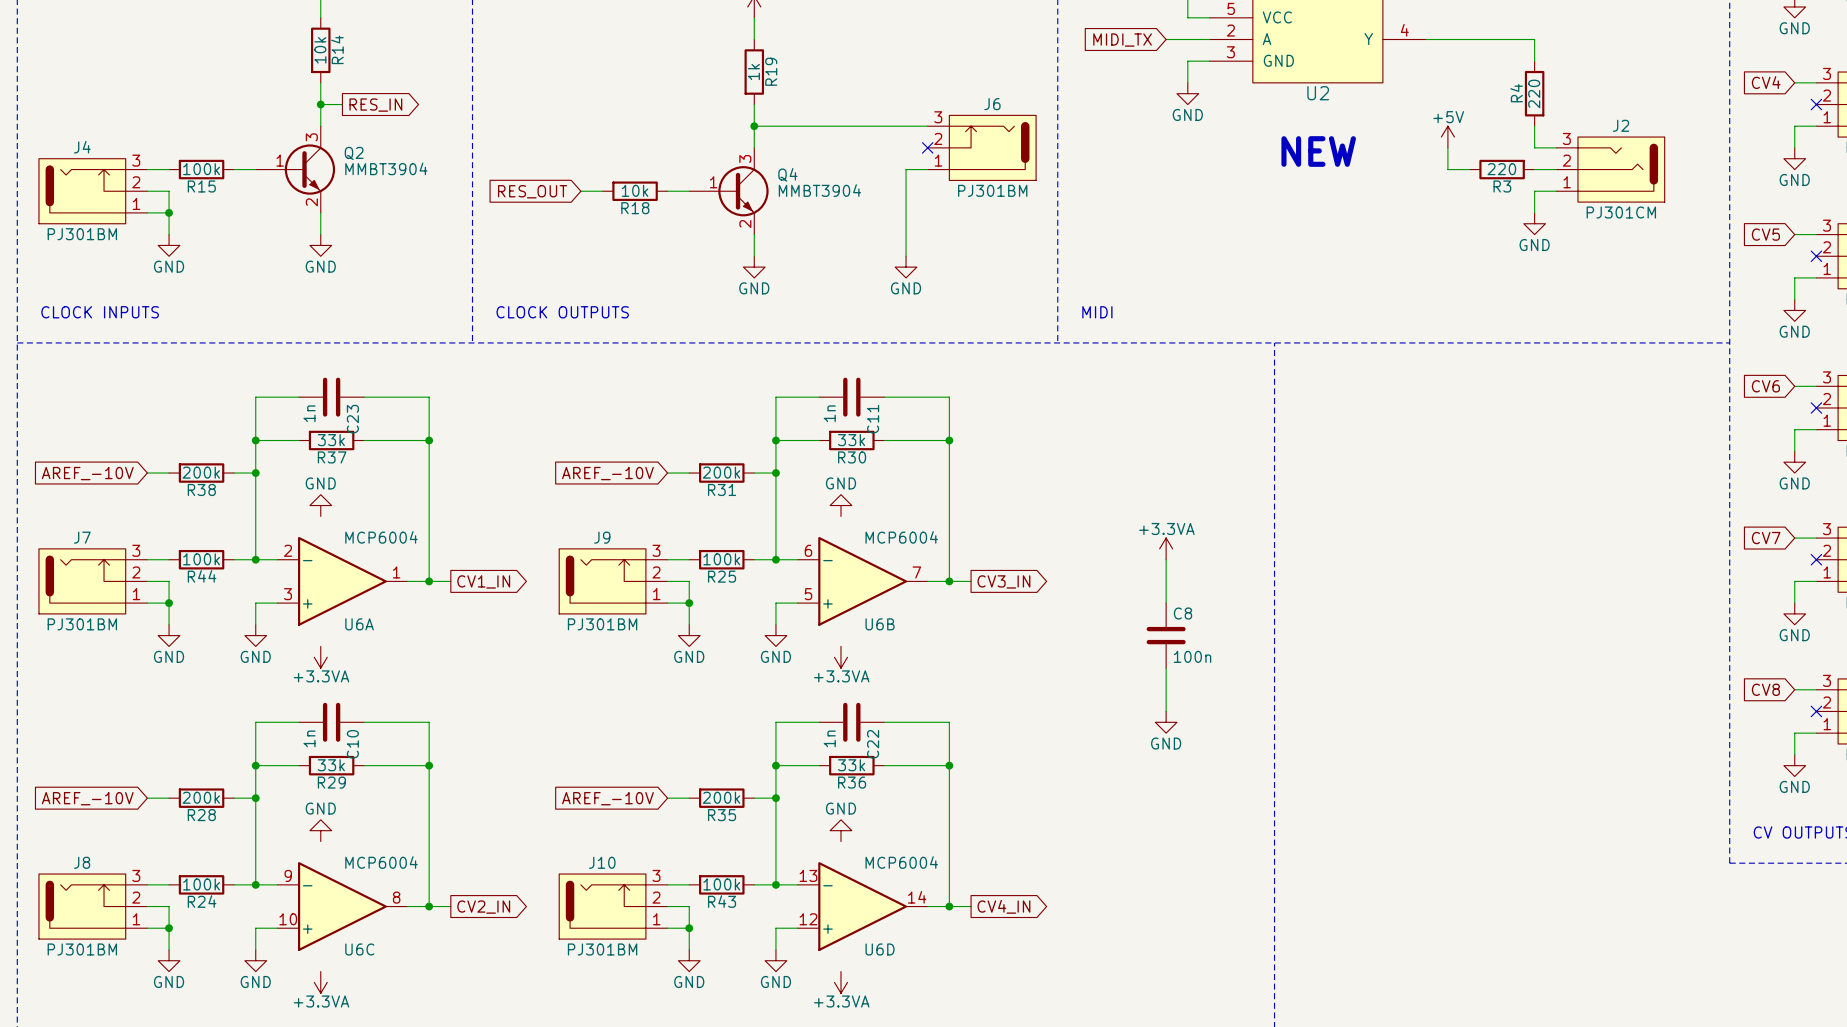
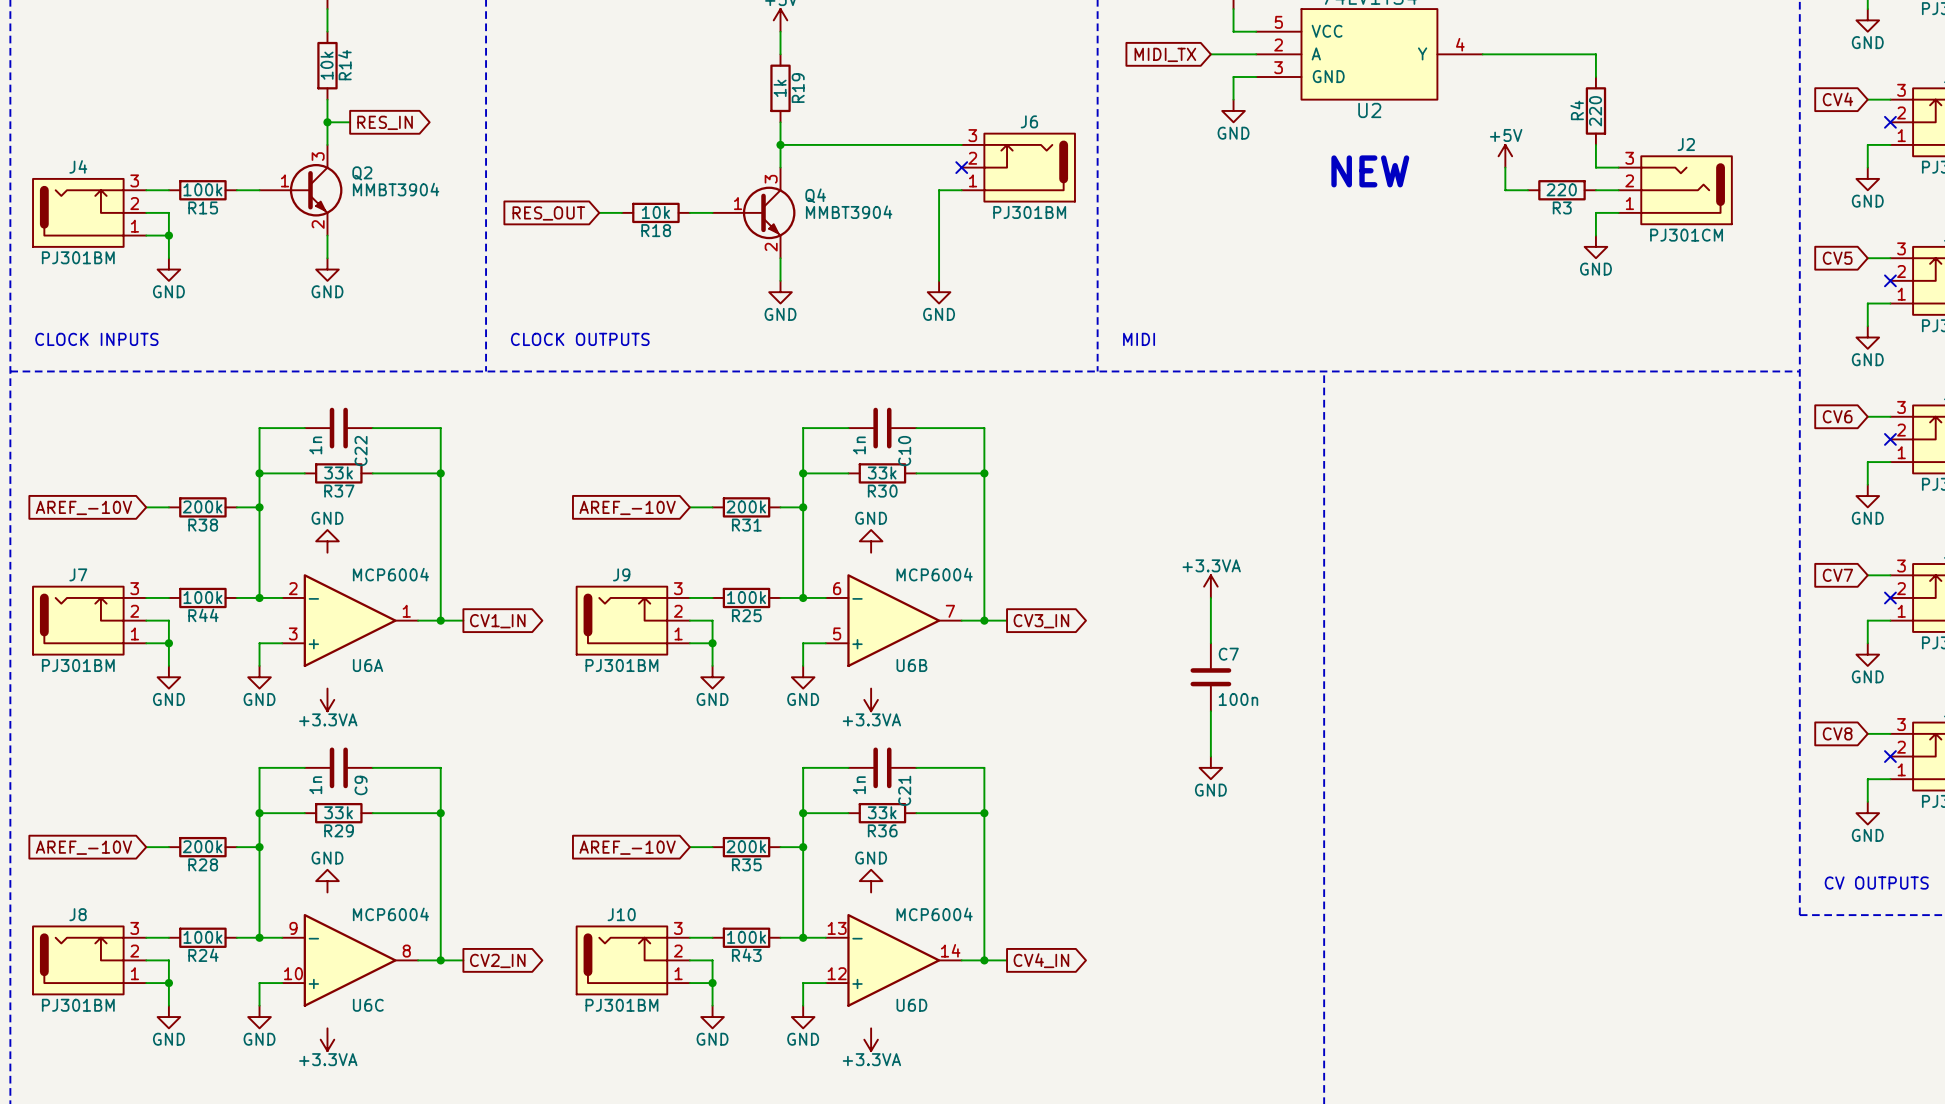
C23 name: C23 (352, 419) -> C22 (361, 451)
C11 name: C11 (873, 419) -> C10 (904, 451)
C8 name: C8 (1182, 613) -> C7 (1228, 654)
C10 name: C10 (352, 744) -> C9 (361, 785)
C22 name: C22 (873, 744) -> C21 (904, 790)

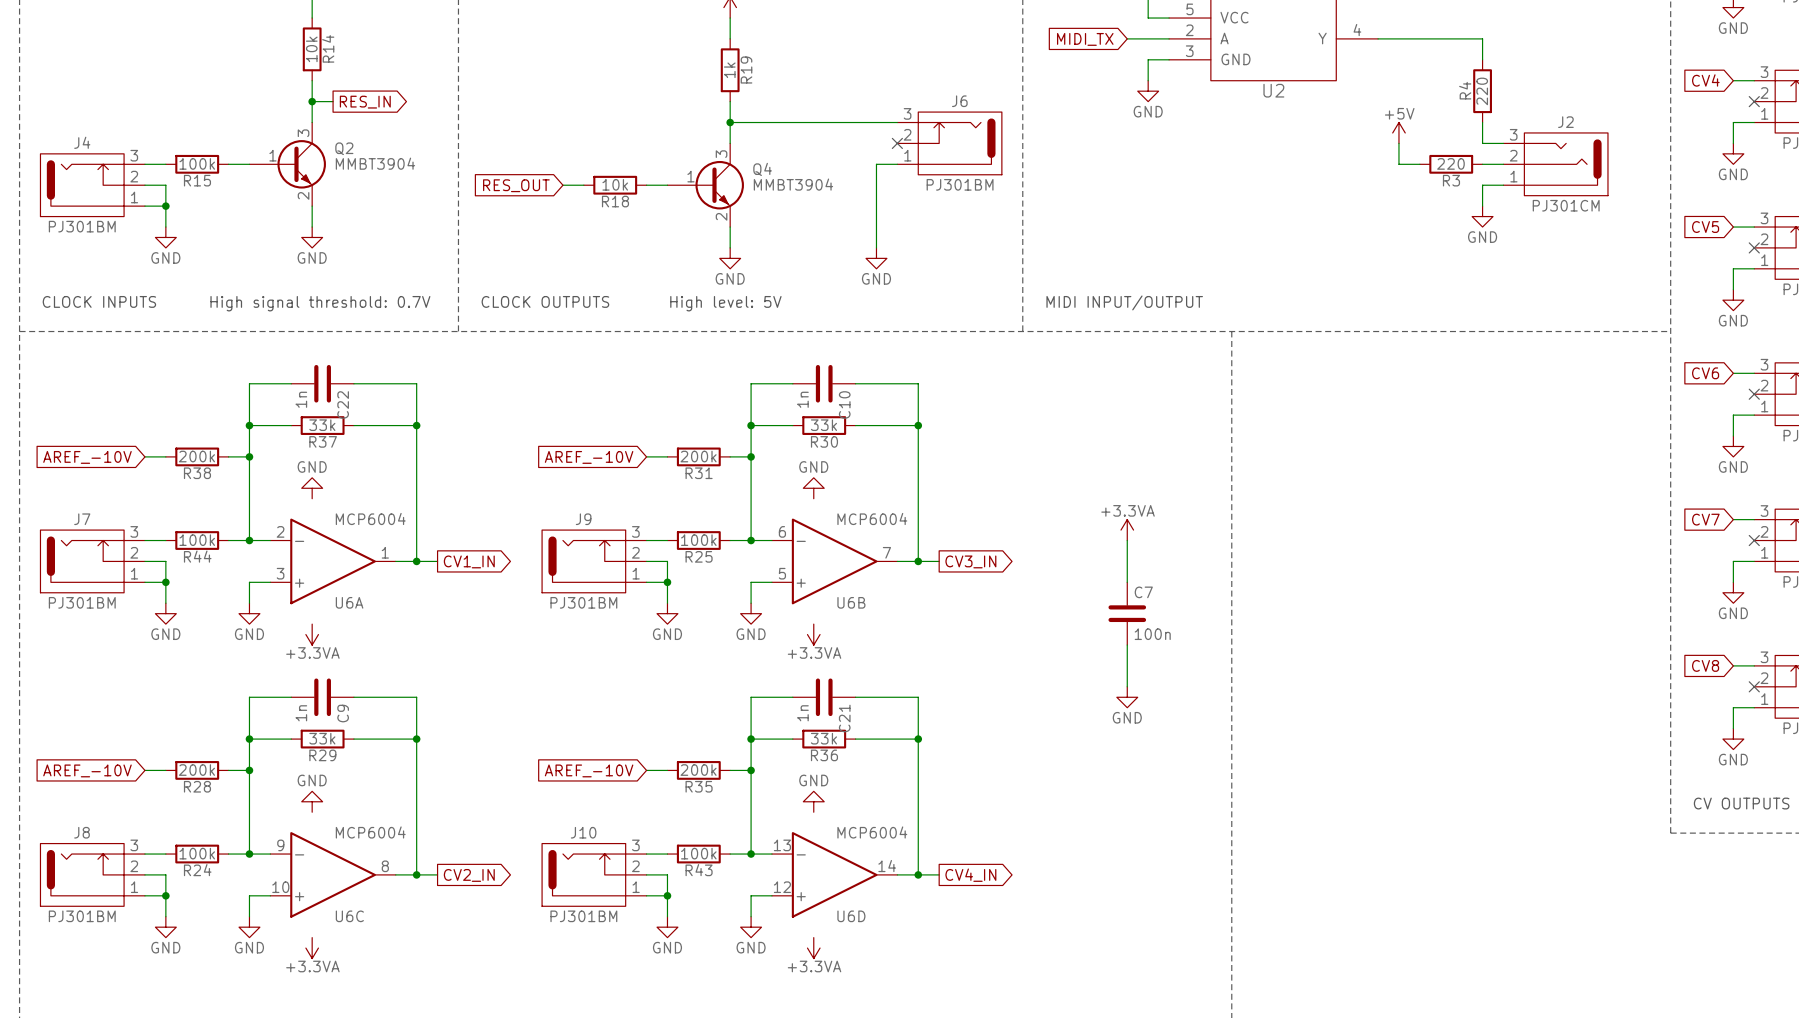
text: NEW (1370, 171) -> none
text: MIDI (1139, 339) -> MIDI INPUT/OUTPUT (1124, 302)
text: none -> High signal threshold: 0.7V (320, 303)
text: none -> High level: 5V (725, 303)

